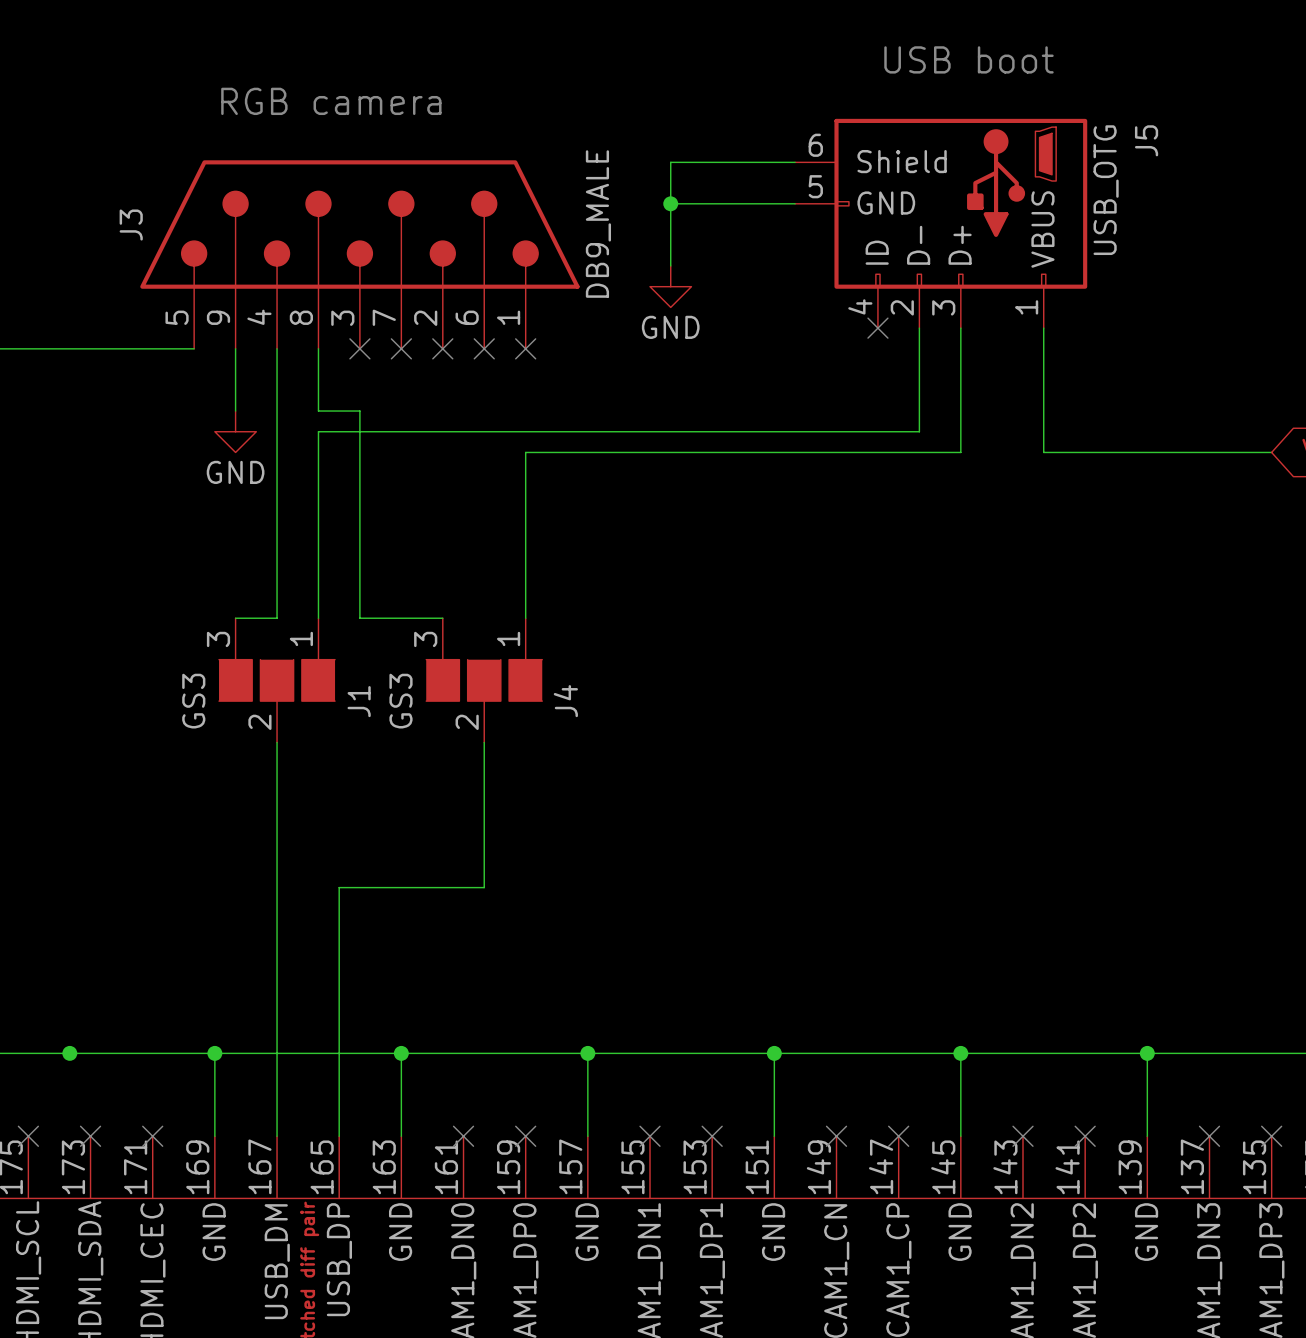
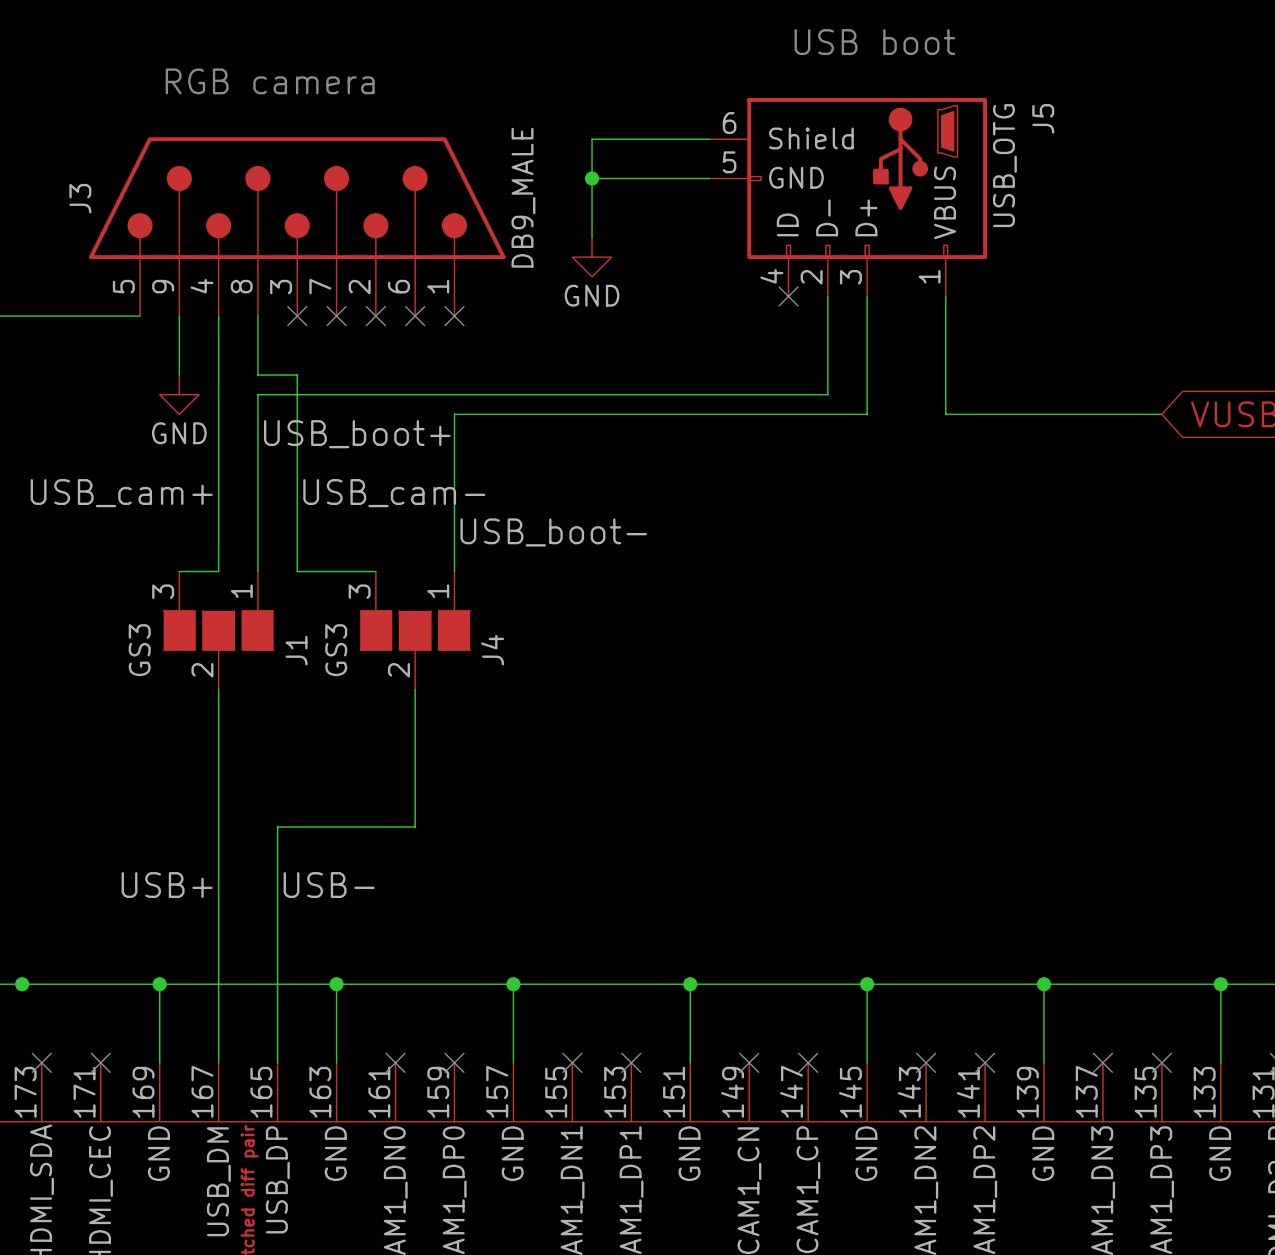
label: none -> USB_boot+ (357, 434)
label: none -> USB_cam+ (121, 493)
label: none -> USB_cam- (394, 493)
label: none -> USB_boot- (553, 532)
label: none -> USB+ (167, 885)
label: none -> USB- (329, 885)

